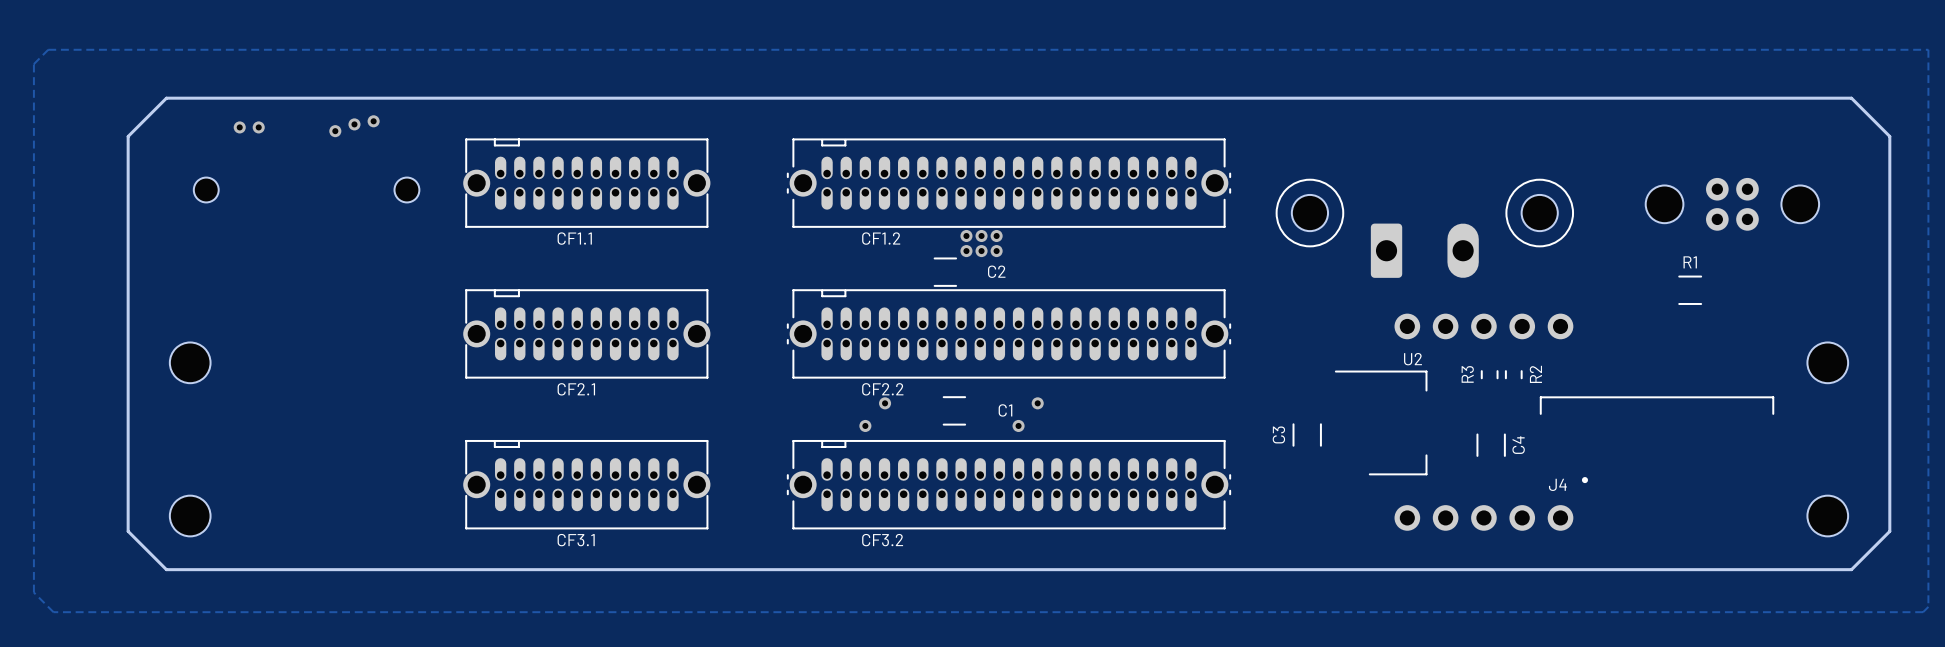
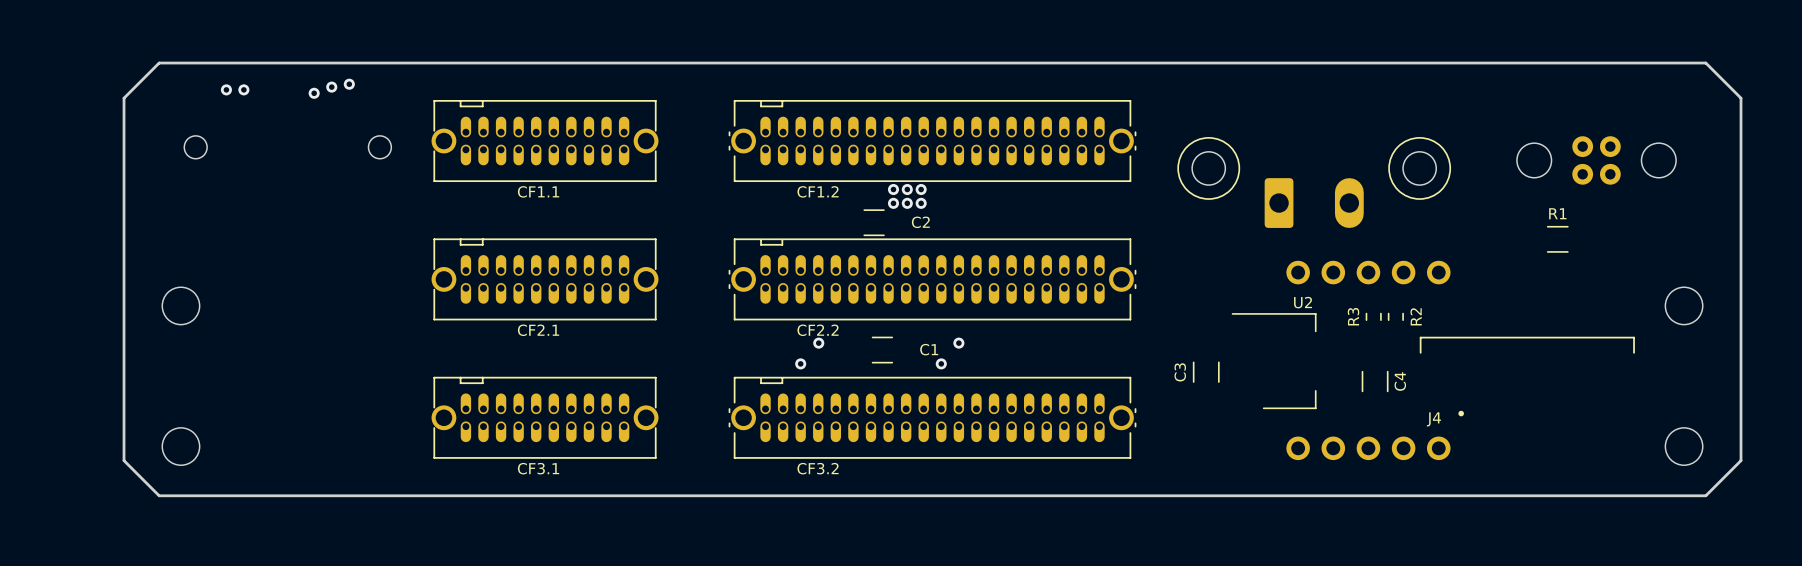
zone outline: (48, 49) (1928, 49) (1928, 606) (1923, 612) (53, 612) (33, 592) (33, 64) (48, 49) -> none

